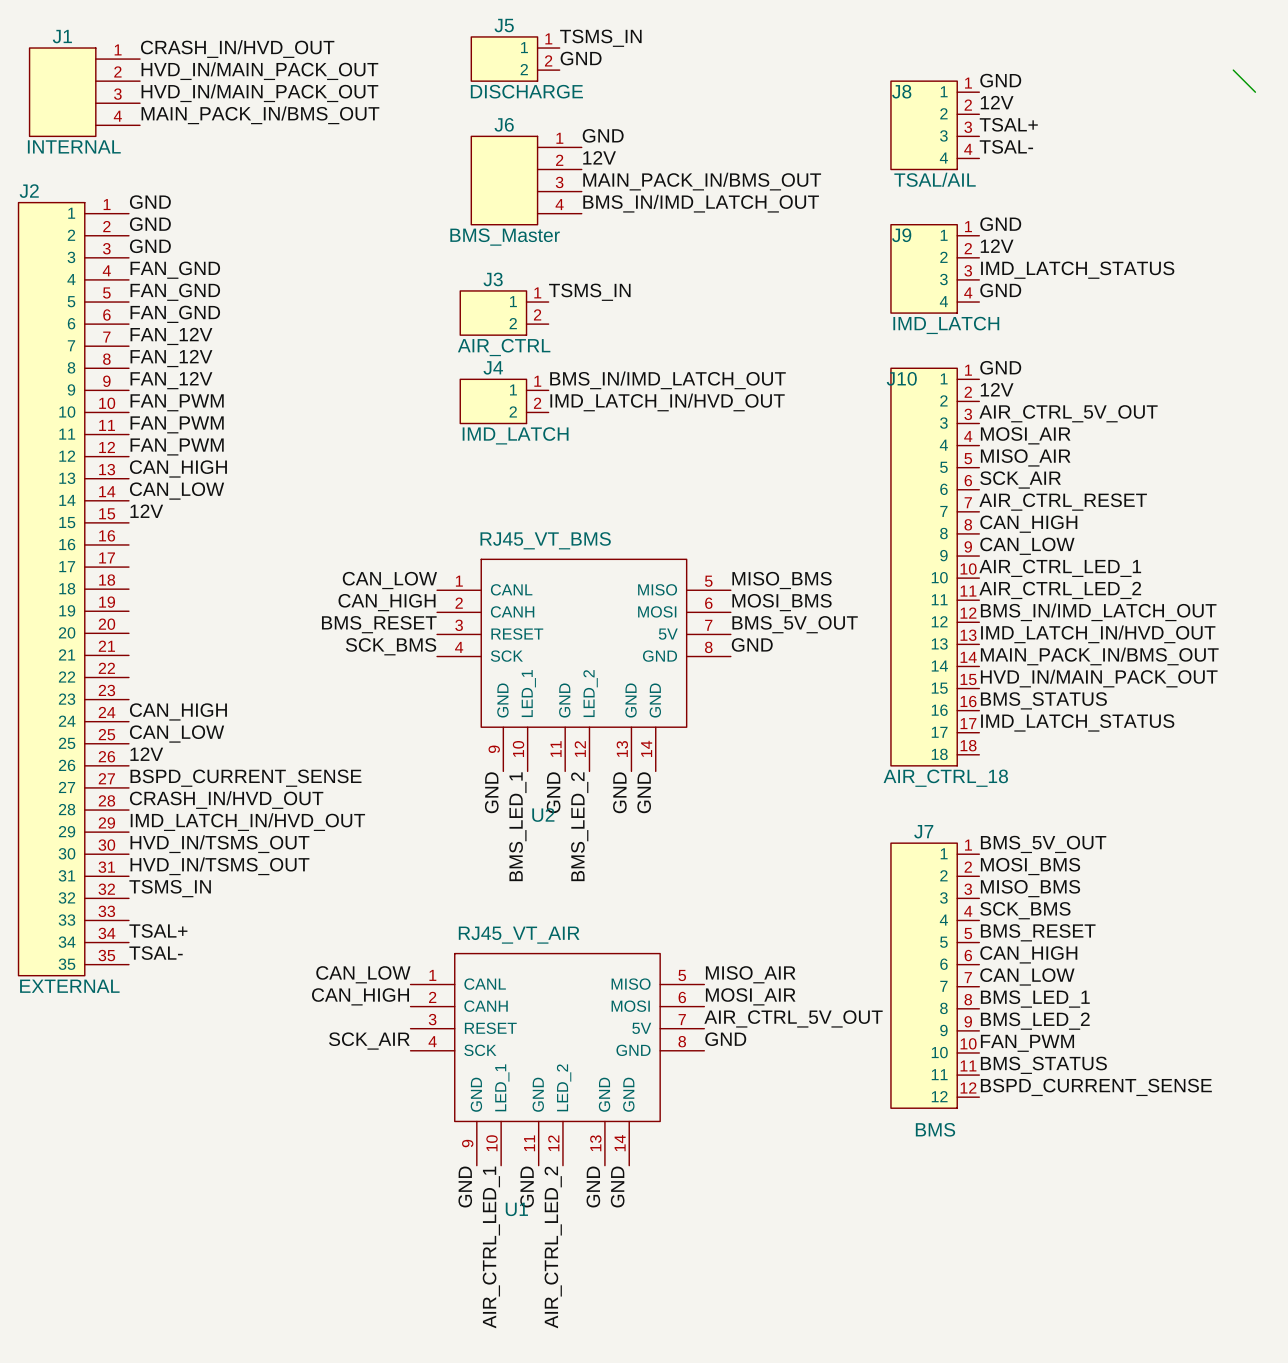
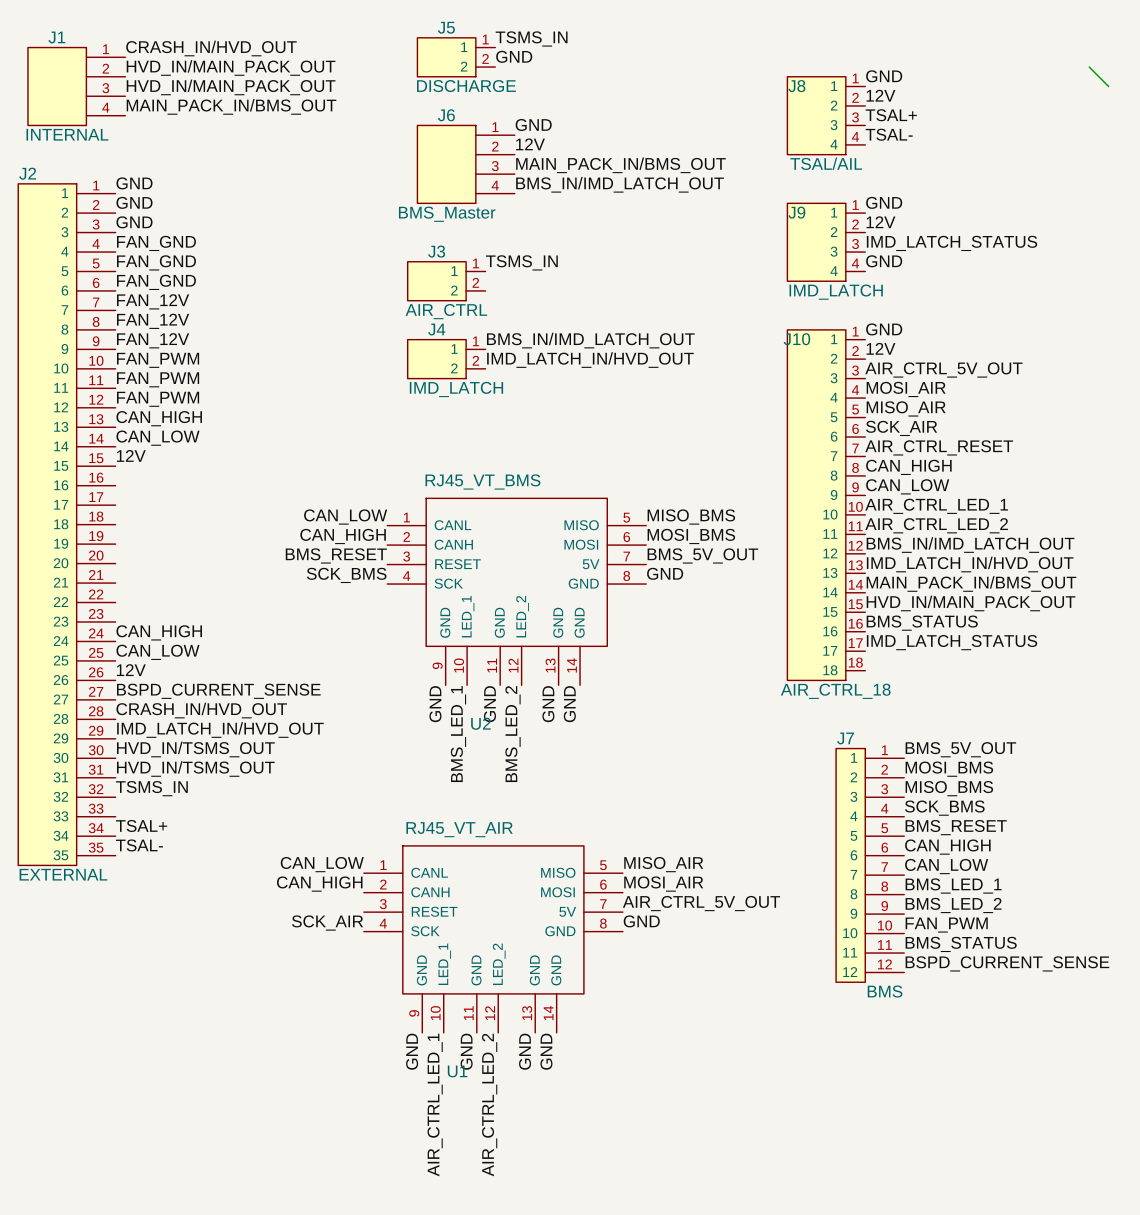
J7 symbol: [890, 843, 980, 1109] -> [836, 748, 905, 983]
label position: BMS_5V_OUT (1043, 844) -> BMS_5V_OUT (960, 749)
label position: MOSI_BMS (1030, 866) -> MOSI_BMS (949, 769)
label position: MISO_BMS (1030, 888) -> MISO_BMS (949, 788)
label position: SCK_BMS (1025, 910) -> SCK_BMS (944, 808)
label position: BMS_RESET (1038, 932) -> BMS_RESET (956, 827)
label position: CAN_HIGH (1028, 954) -> CAN_HIGH (947, 847)
label position: CAN_LOW (1027, 976) -> CAN_LOW (946, 866)
label position: BMS_LED_1 (1035, 999) -> BMS_LED_1 (953, 886)
label position: BMS_LED_2 (1035, 1021) -> BMS_LED_2 (953, 905)
label position: FAN_PWM (1027, 1043) -> FAN_PWM (946, 925)
label position: BMS_STATUS (1043, 1065) -> BMS_STATUS (961, 944)
label position: BSPD_CURRENT_SENSE (1096, 1087) -> BSPD_CURRENT_SENSE (1007, 963)
J7 value position: BMS (935, 1129) -> BMS (885, 991)

